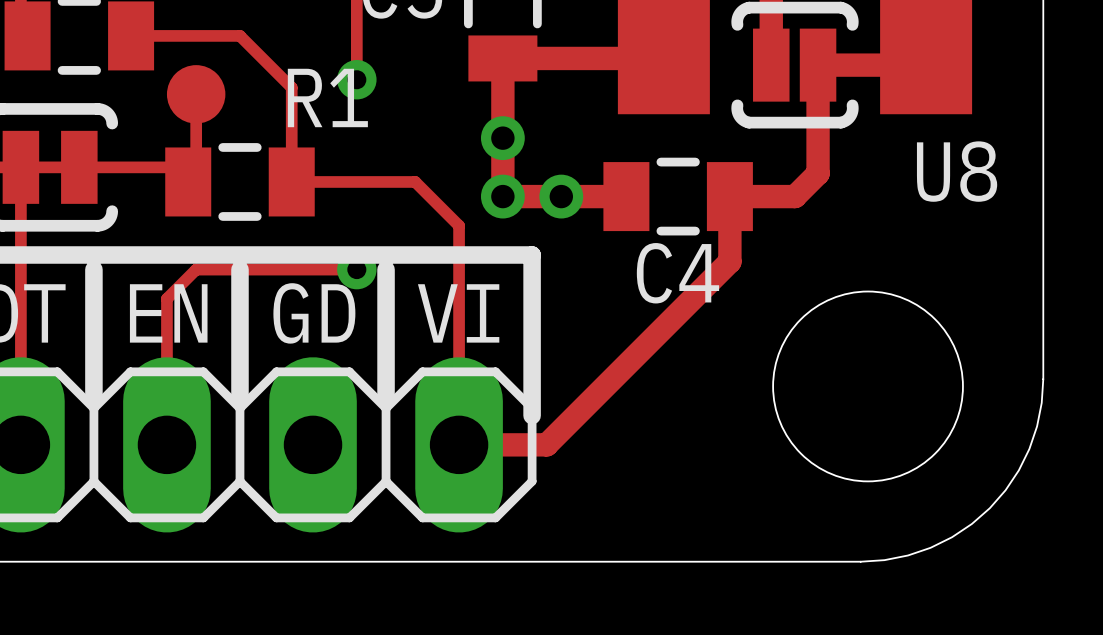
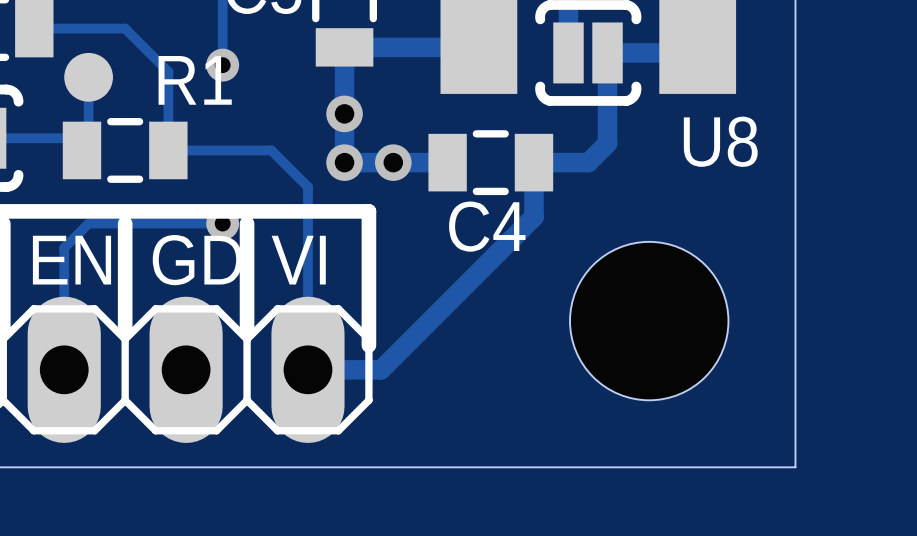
board edge: (1043, 379) (1041, 402) (1037, 426) (1029, 449) (1018, 470) (1005, 490) (989, 508) (971, 523) (952, 537) (930, 547) (907, 555) (884, 560) (860, 561) -> (795, 314) (795, 467) (643, 467)

